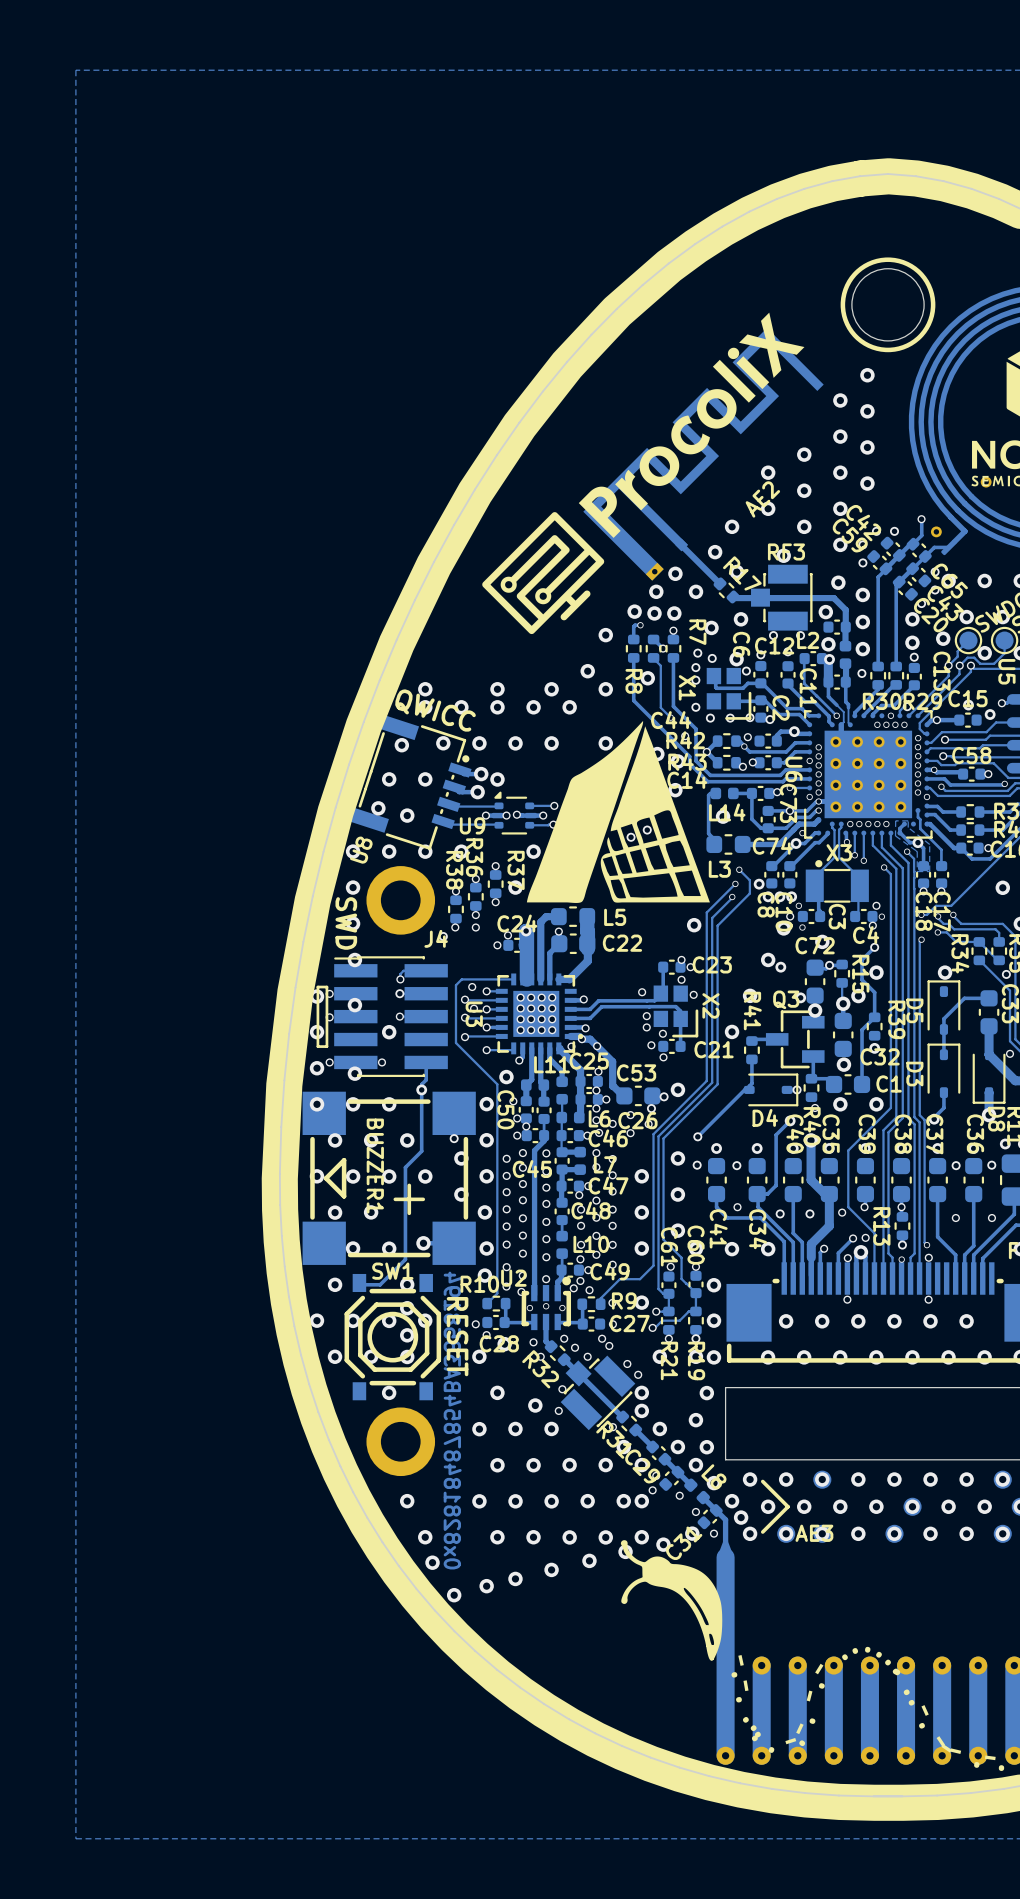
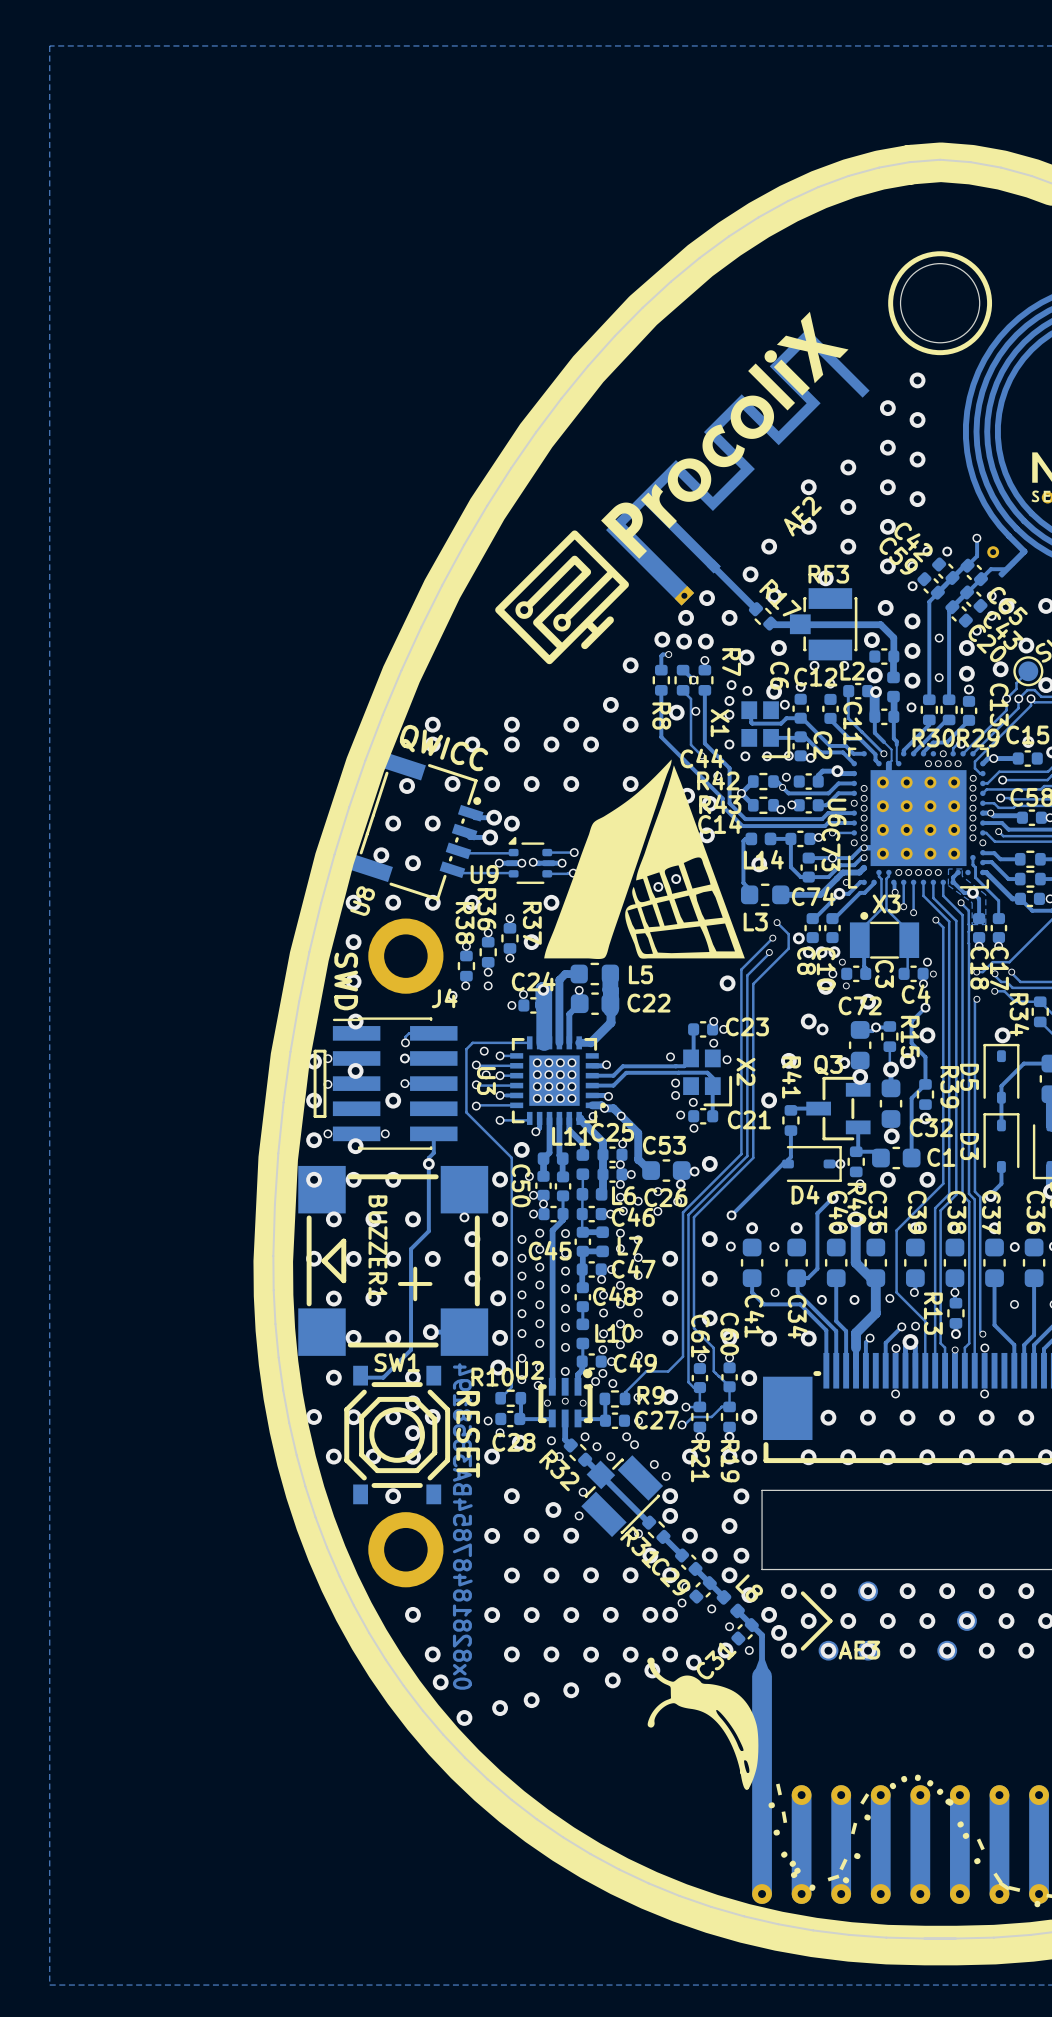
via: none -> (939, 638)
via: none -> (939, 677)
via: none -> (695, 711)

